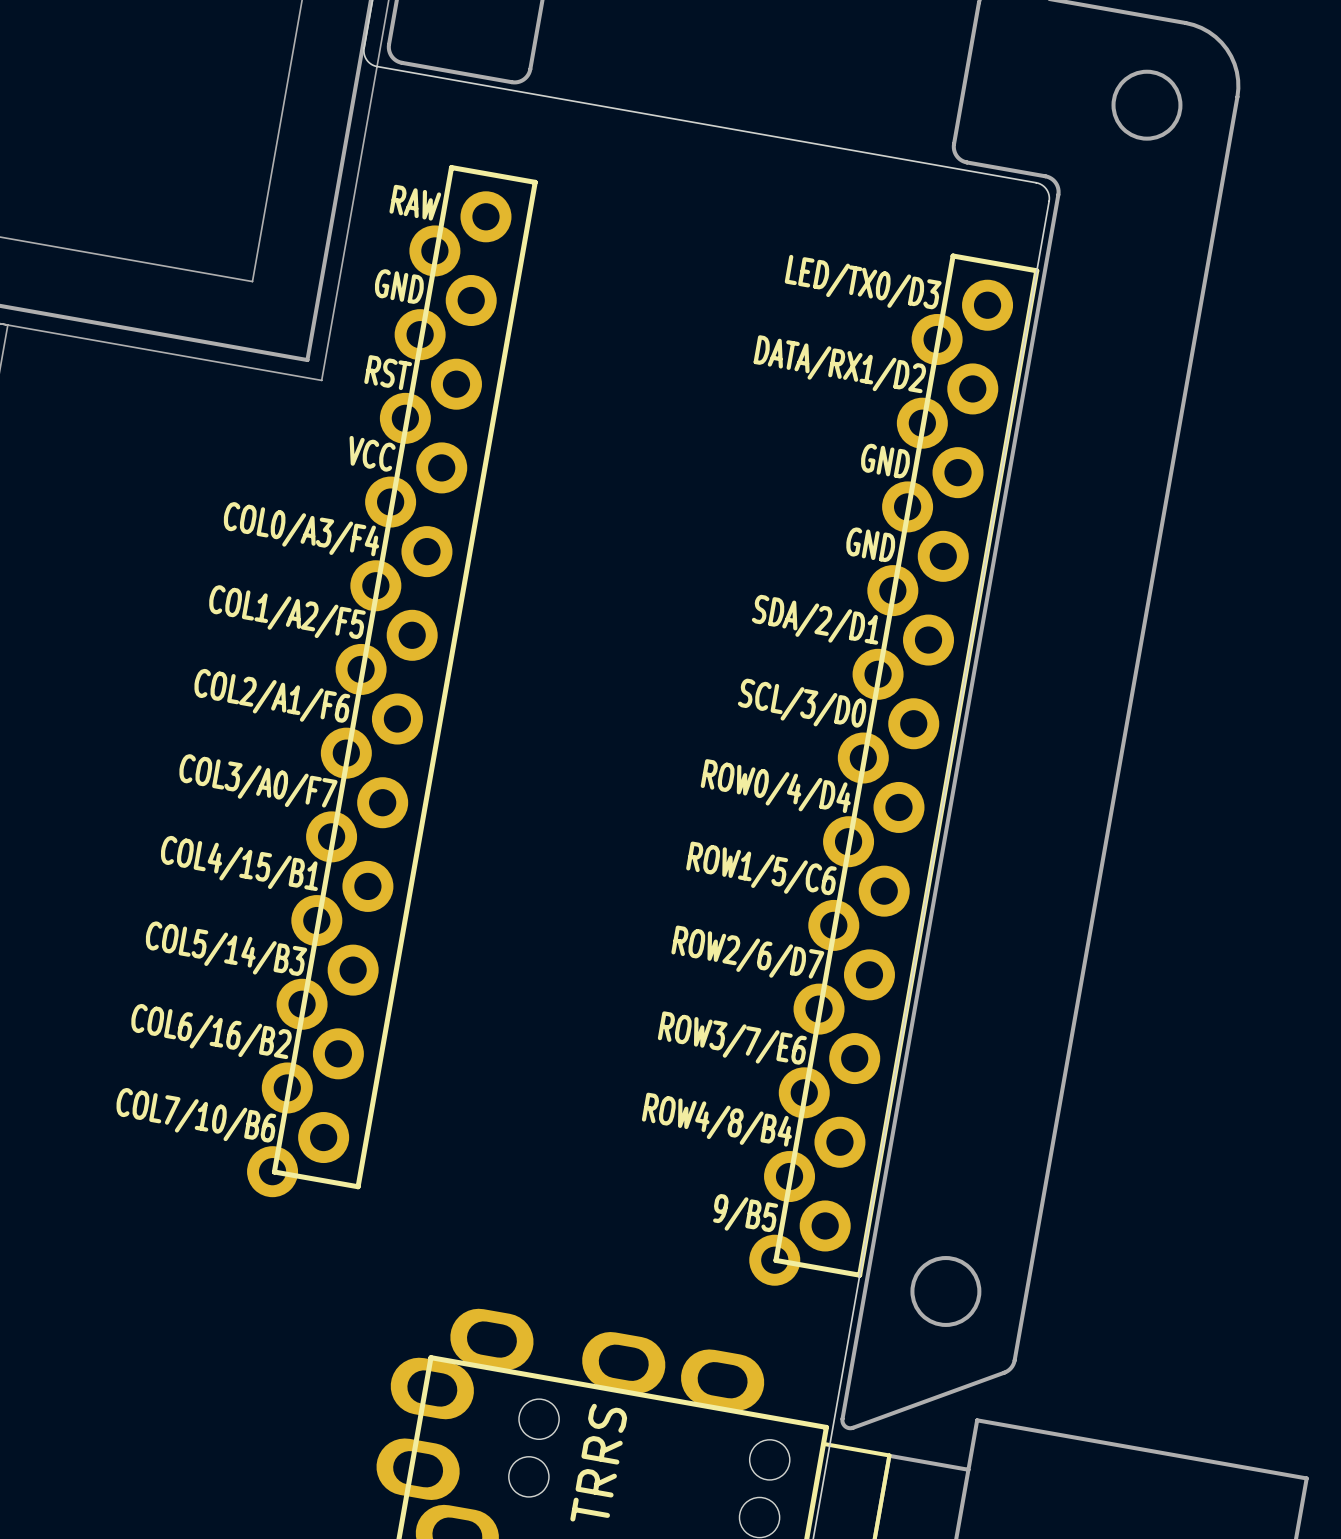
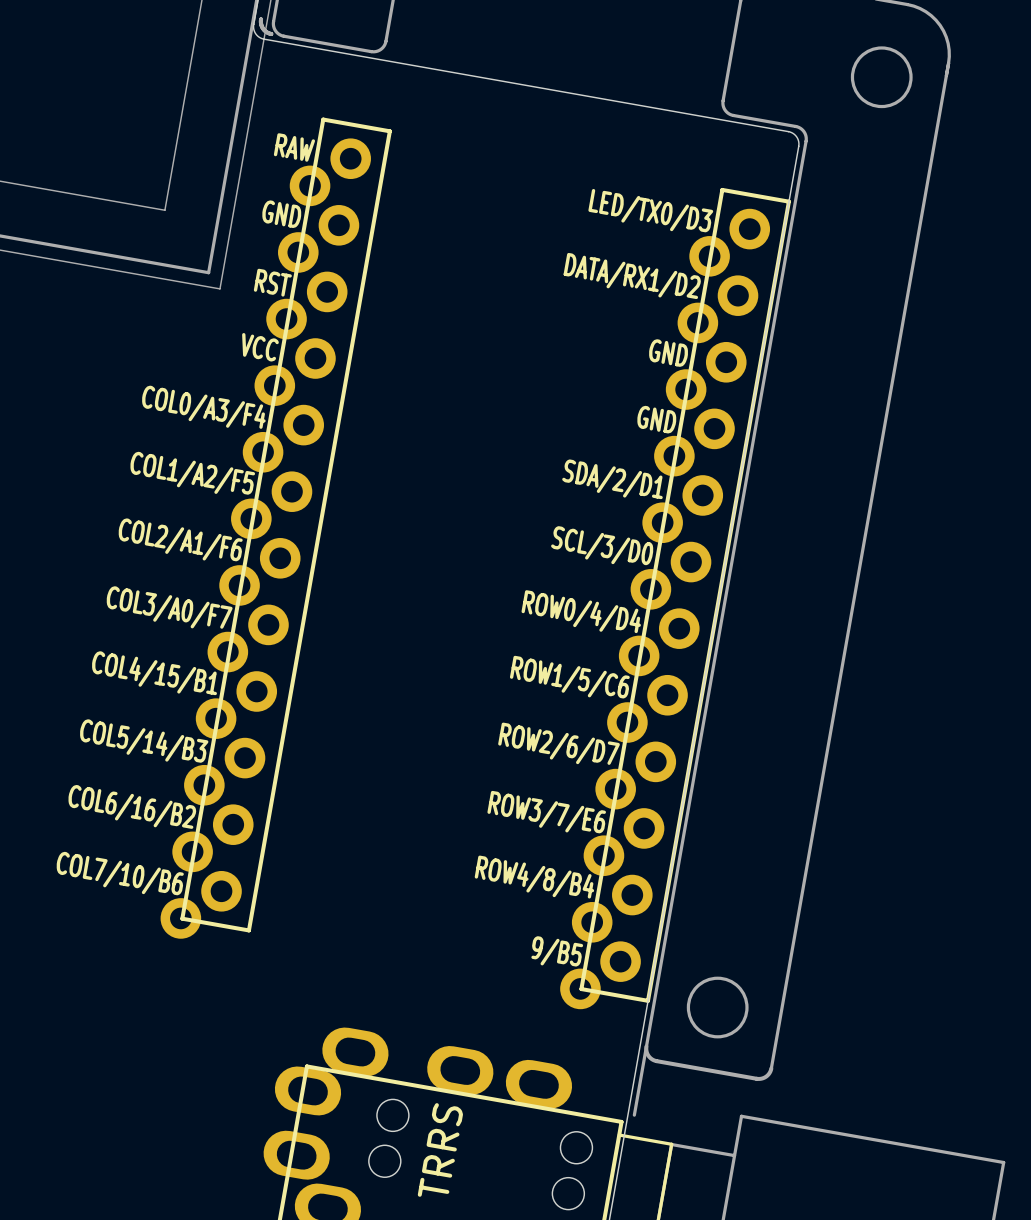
line: none -> (261, 19) (263, 28) (271, 34) (266, 32) (263, 28) (261, 24) (261, 19)
drawing shape: [1111, 69, 1183, 141] -> [850, 46, 913, 109]
drawing shape: [910, 1256, 982, 1327] -> [686, 976, 749, 1039]
line: (1014, 1360) (1011, 1367) (1004, 1372) (853, 1427) (845, 1426) (842, 1418) -> (771, 1068) (766, 1076) (758, 1078) (656, 1061) (648, 1055) (646, 1046)

